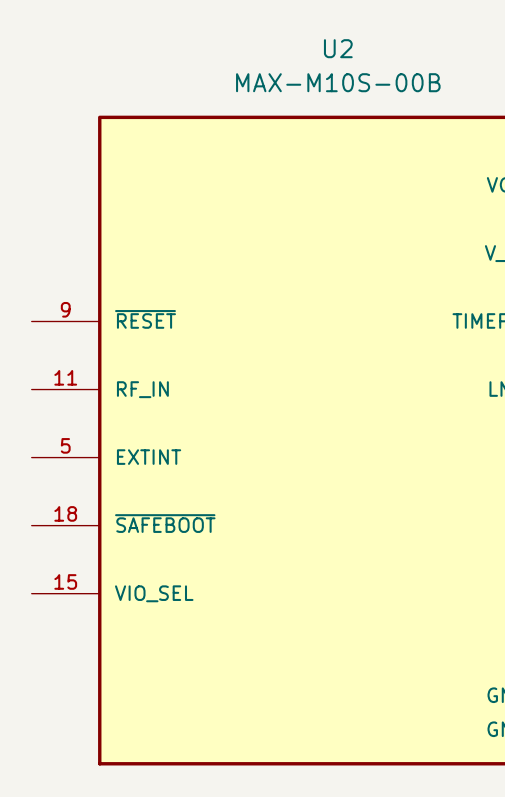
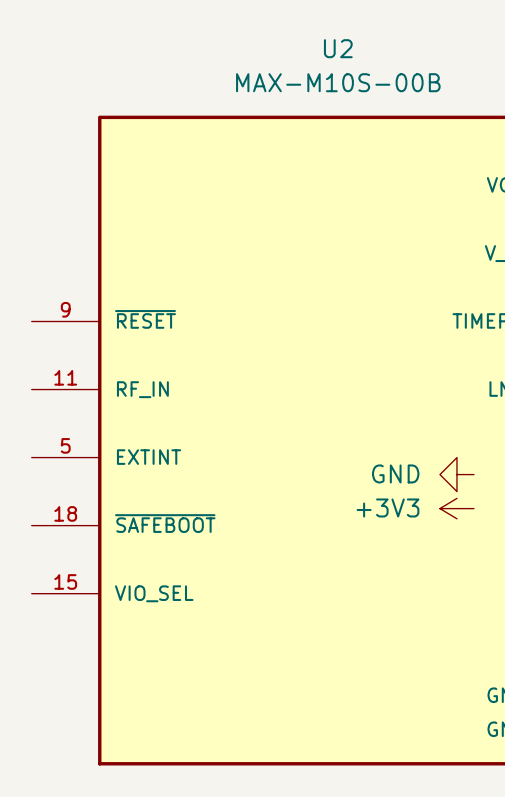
power symbol: none -> GND (456, 474)
power symbol: none -> +3V3 (456, 508)

